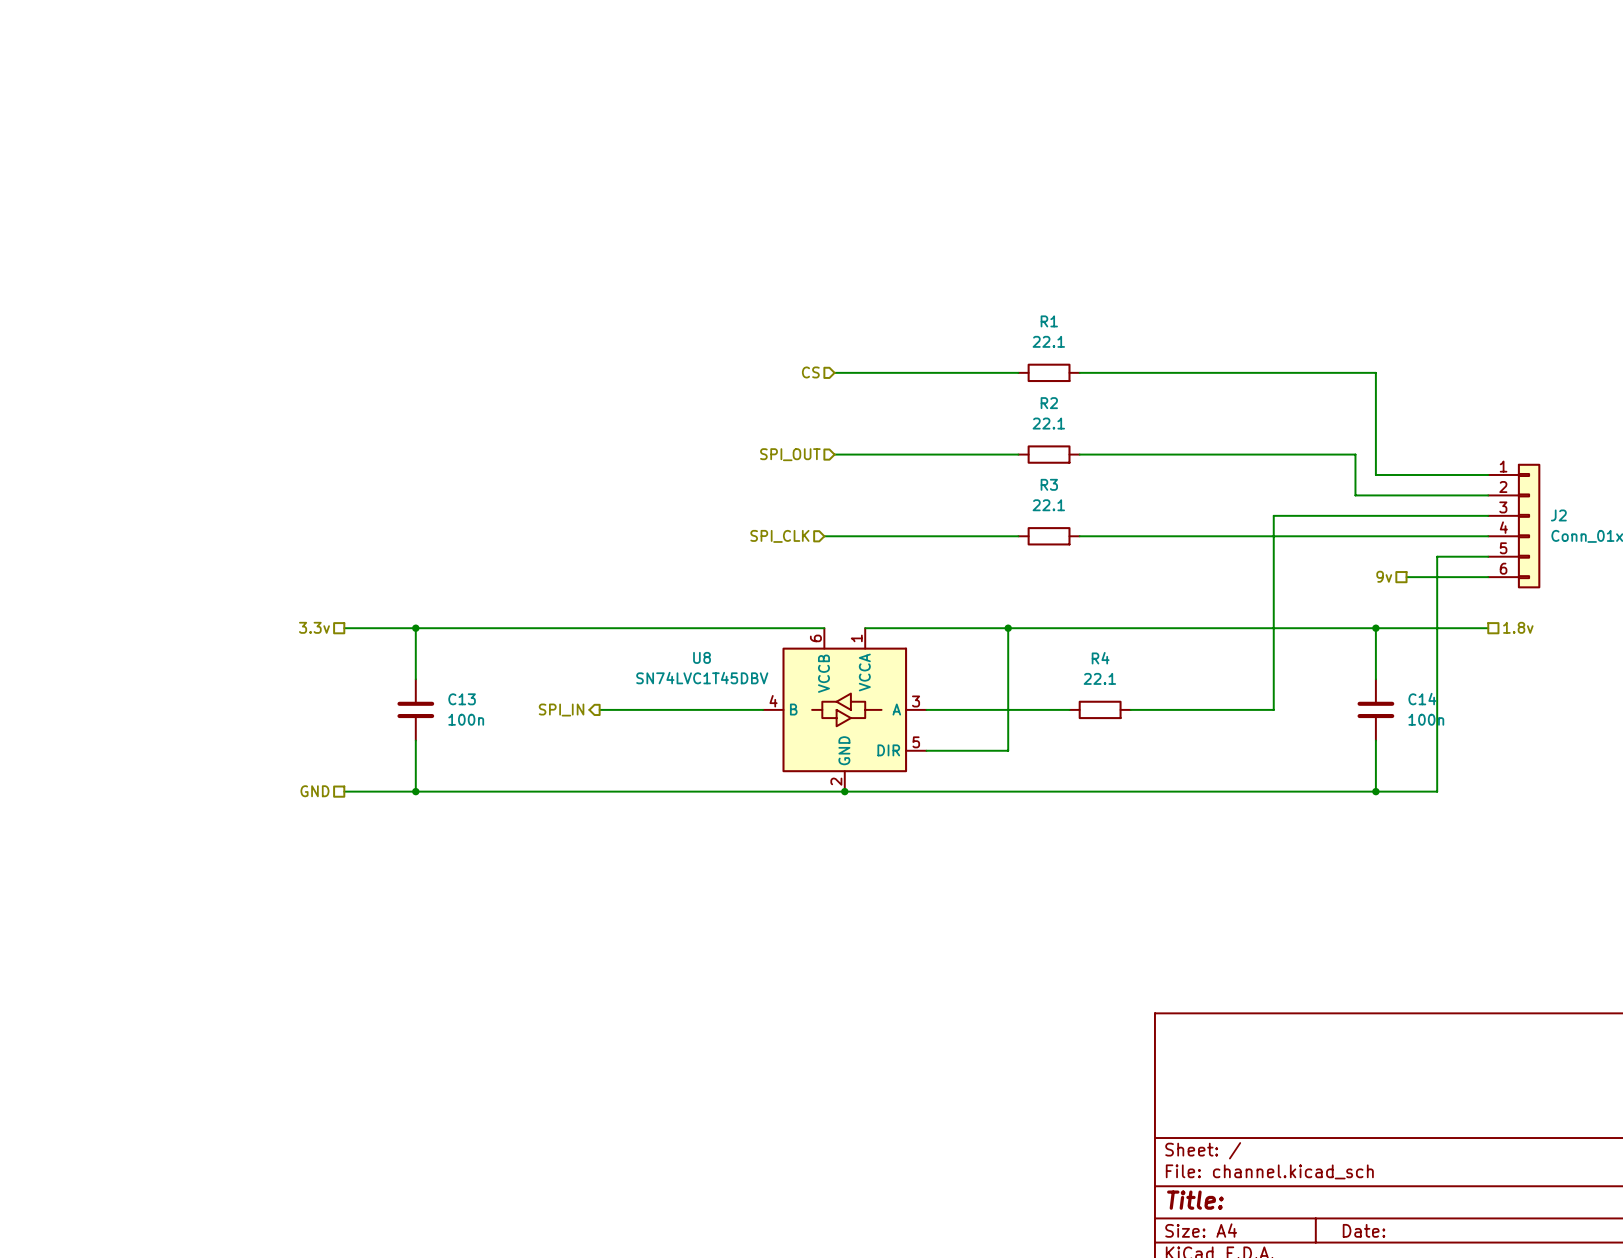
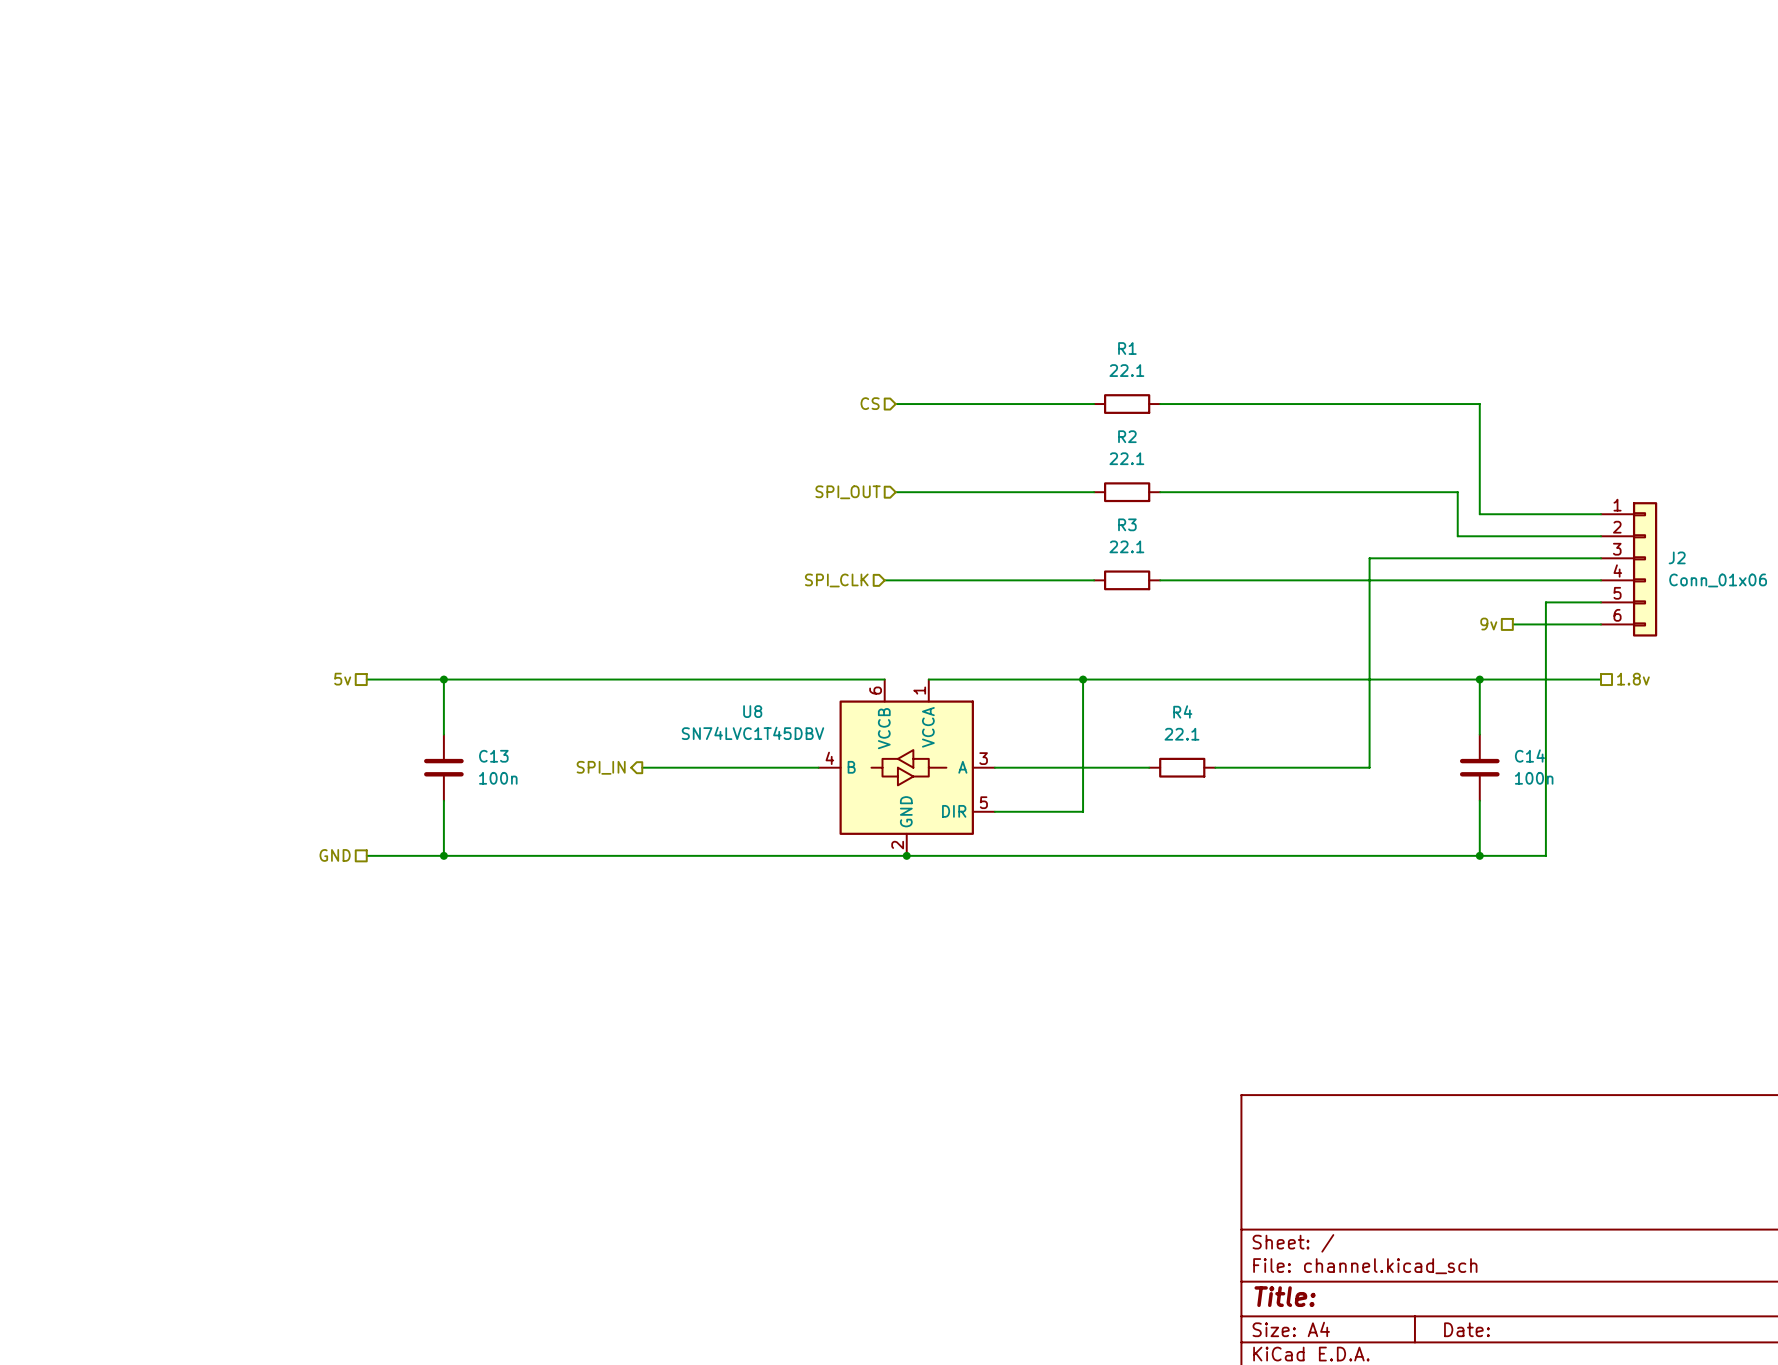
hierarchical label: 3.3v (314, 627) -> 5v (342, 679)

